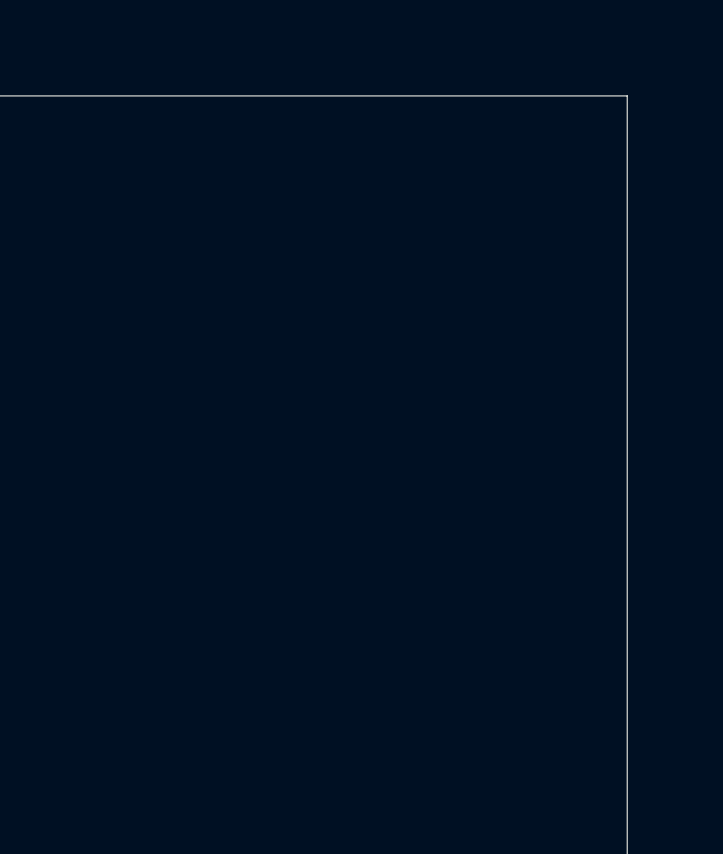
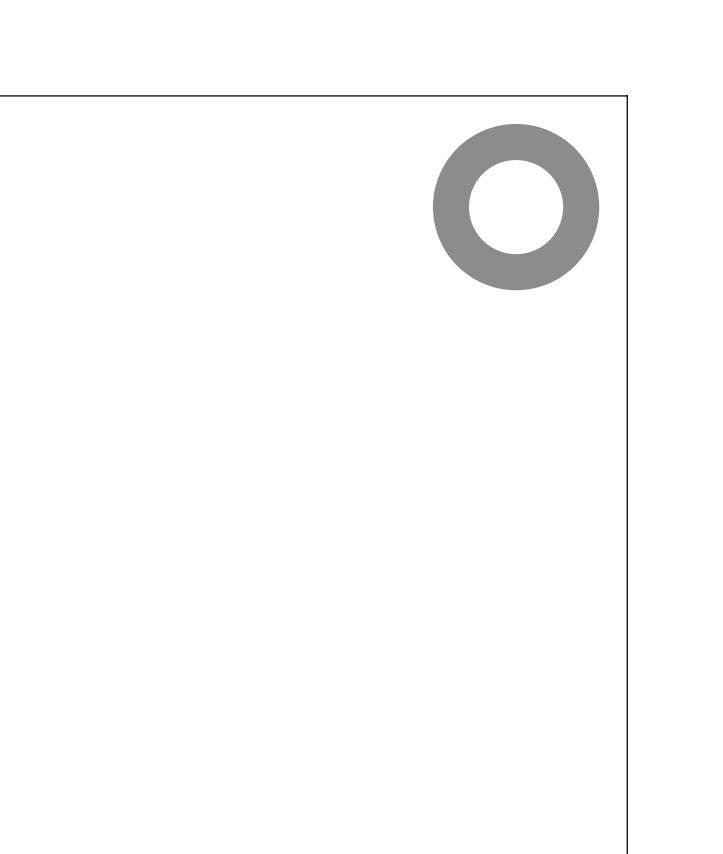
part: none -> (516, 207)

